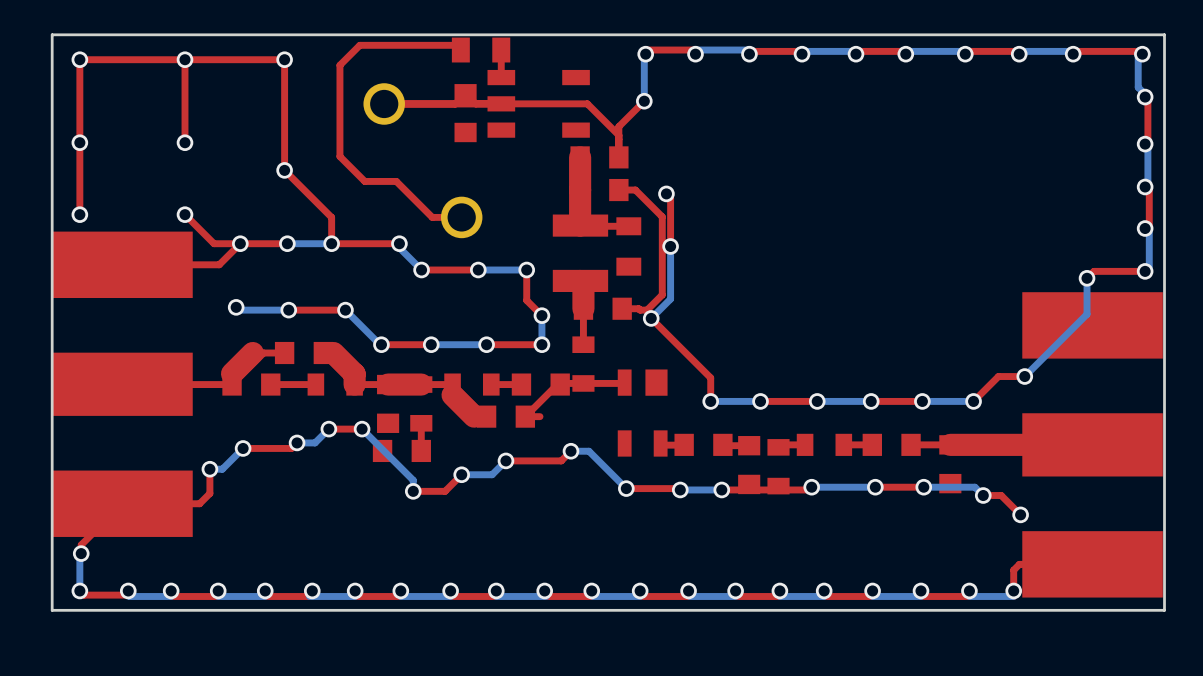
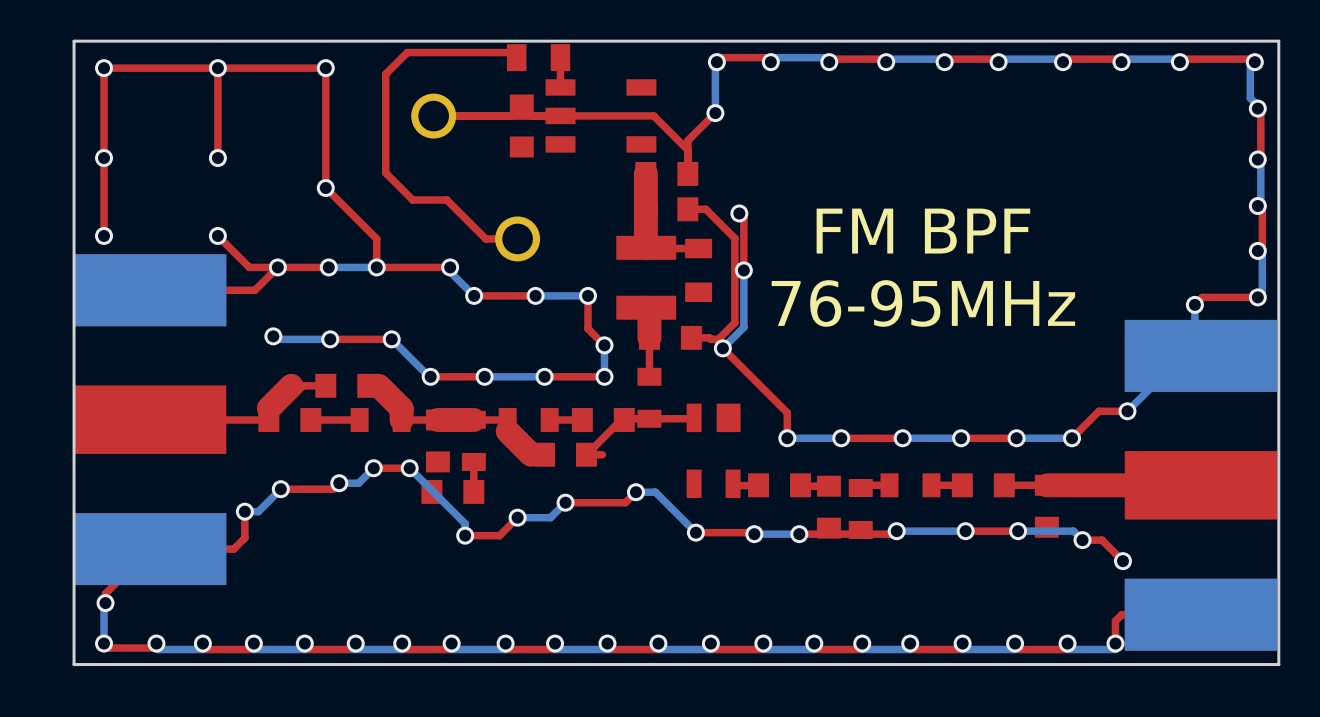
text: none -> FM BPF (923, 231)
part footprint: [52, 231, 193, 537] -> [74, 254, 227, 586]
text: none -> 76-95MHz (923, 303)
part footprint: [1022, 292, 1163, 598] -> [1124, 319, 1278, 651]

